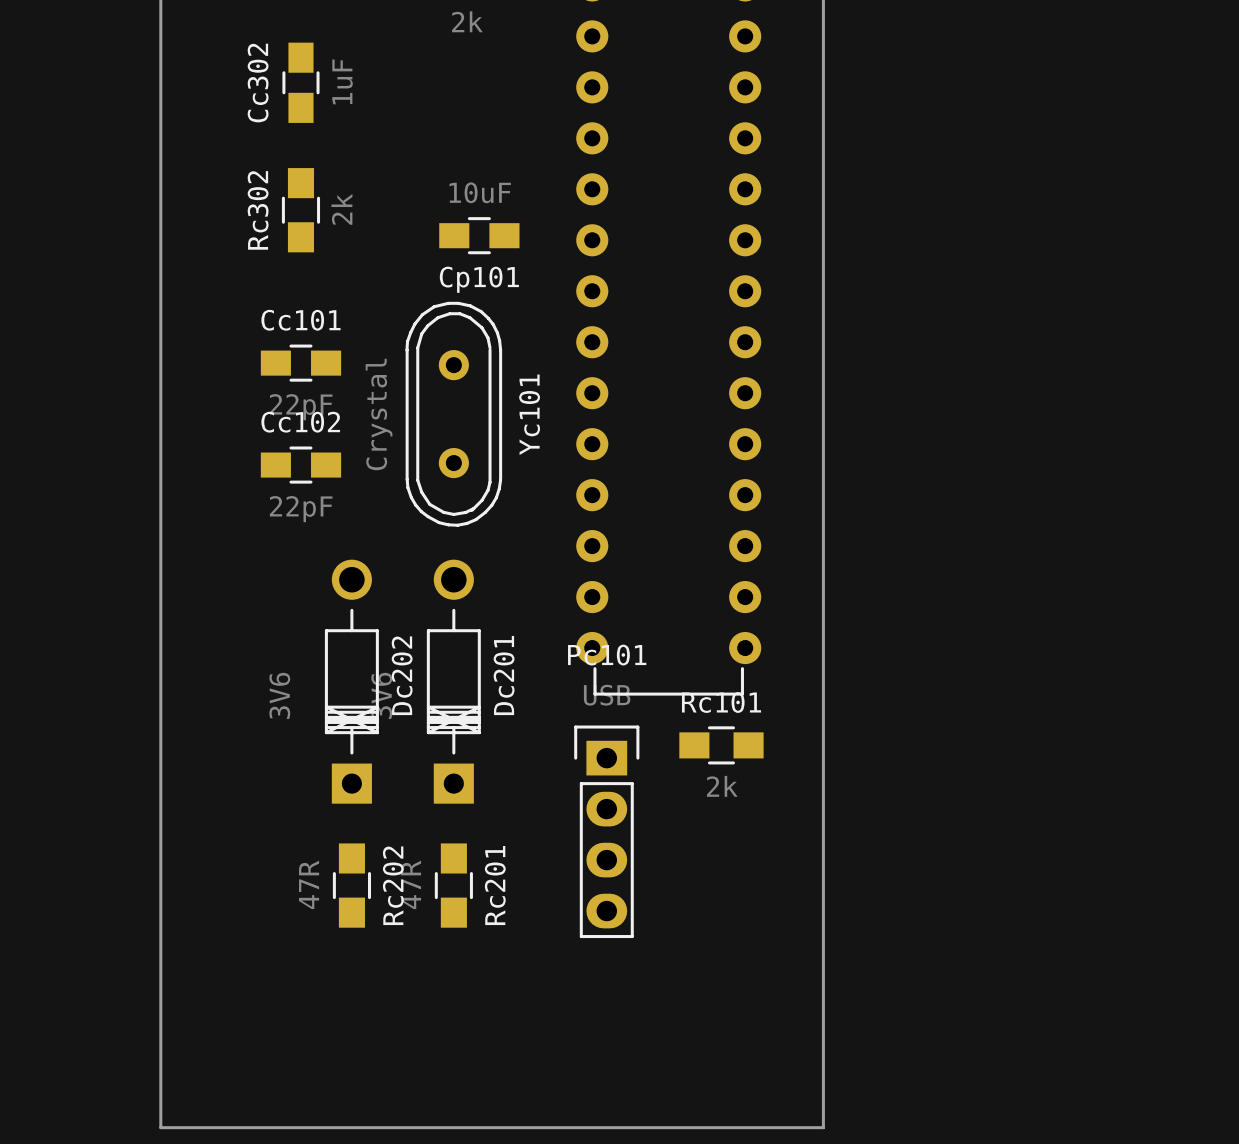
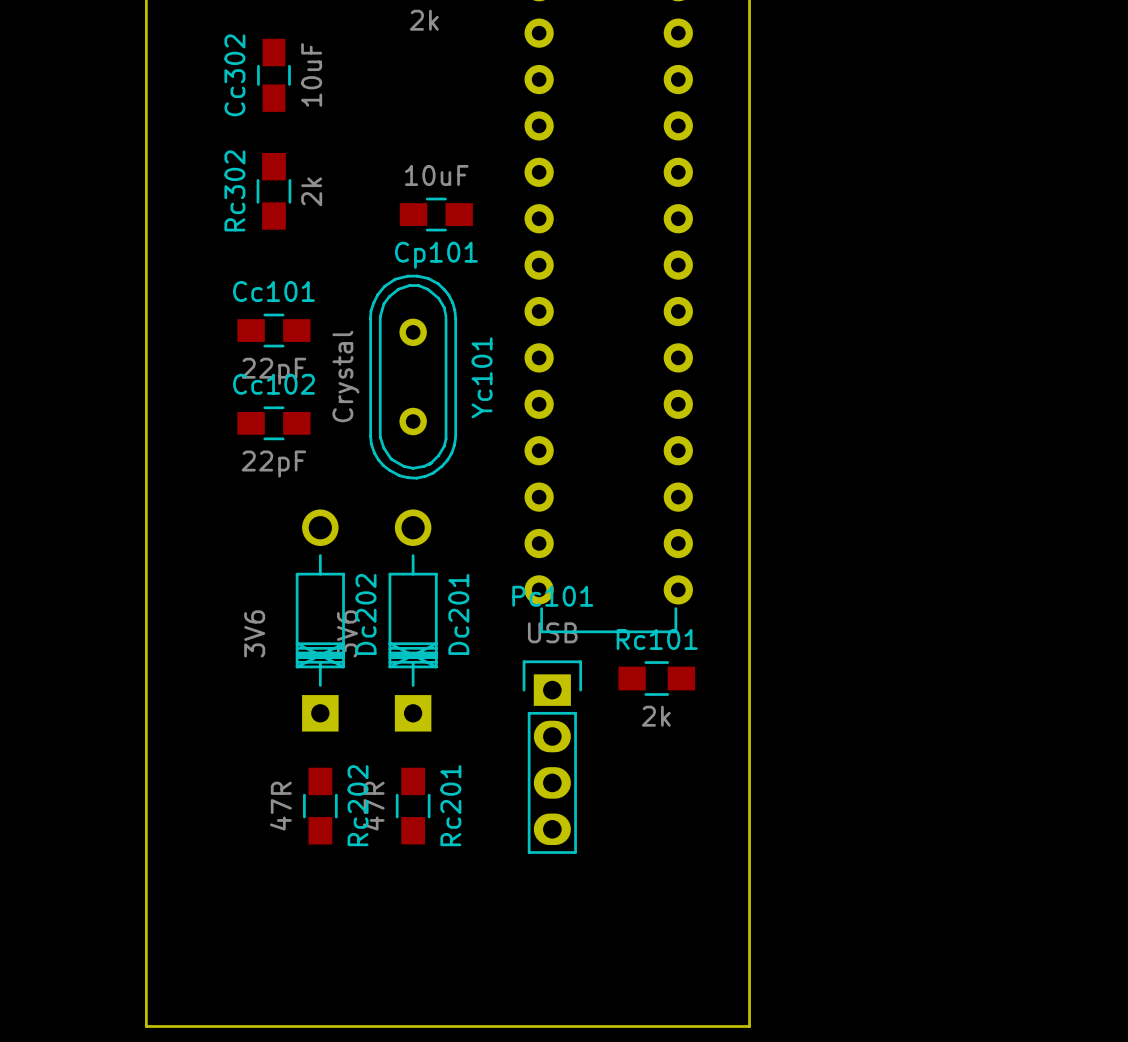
Cc302 value: 1uF (342, 81) -> 10uF (311, 74)

